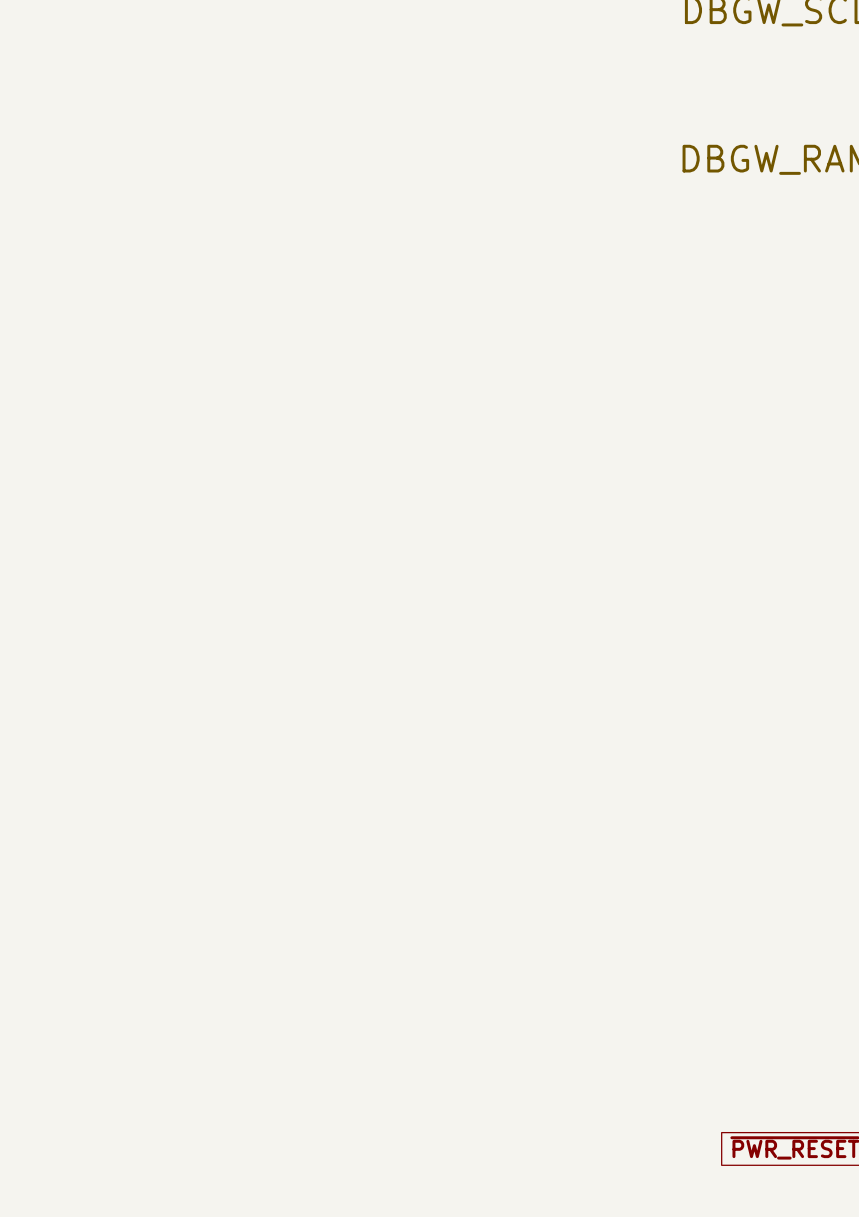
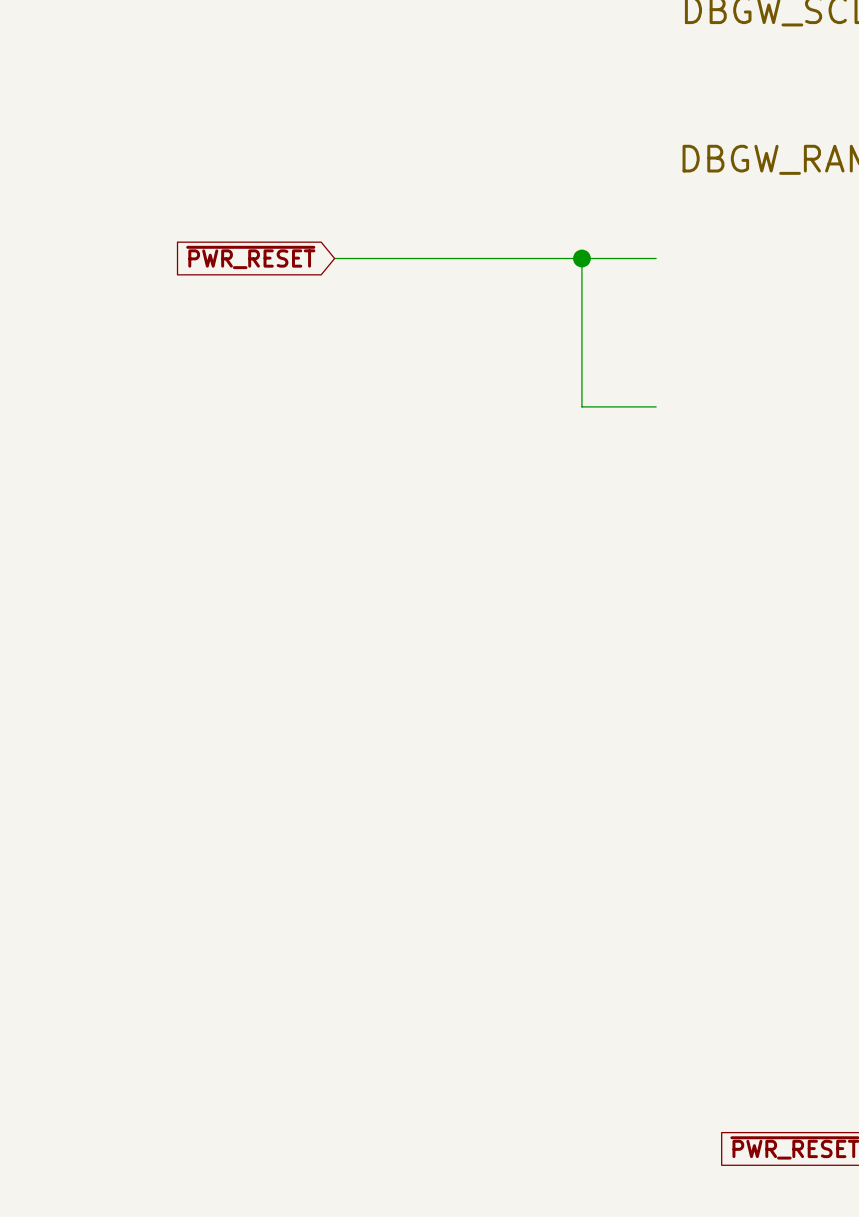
global label: none -> ~{PWR_RESET} (250, 257)
wire: none -> (334, 258) (656, 258)
wire: none -> (581, 258) (581, 406) (656, 406)
junction: none -> (581, 258)

